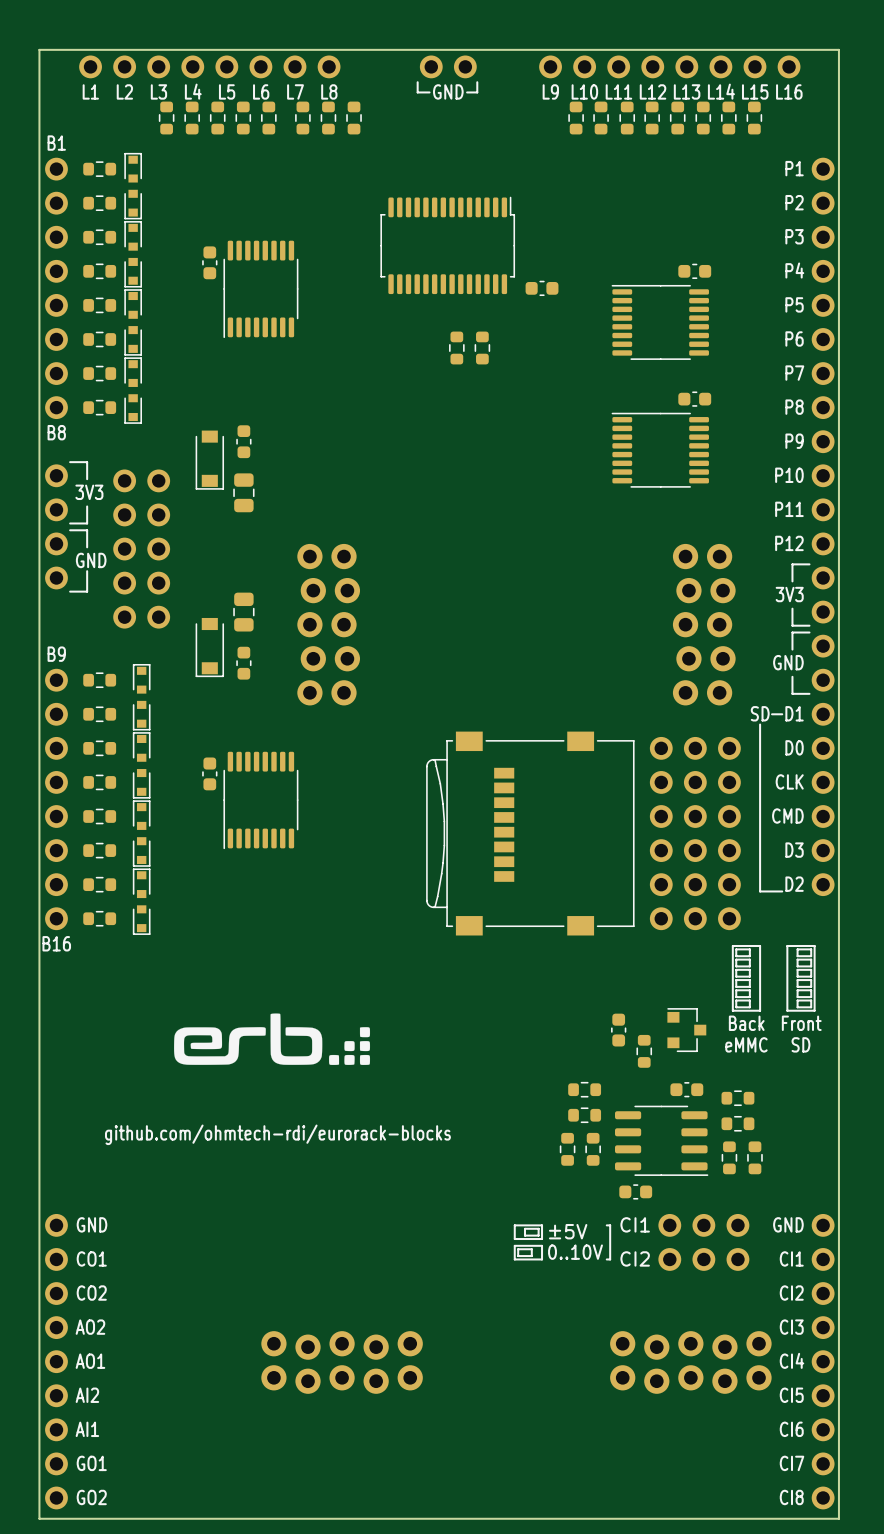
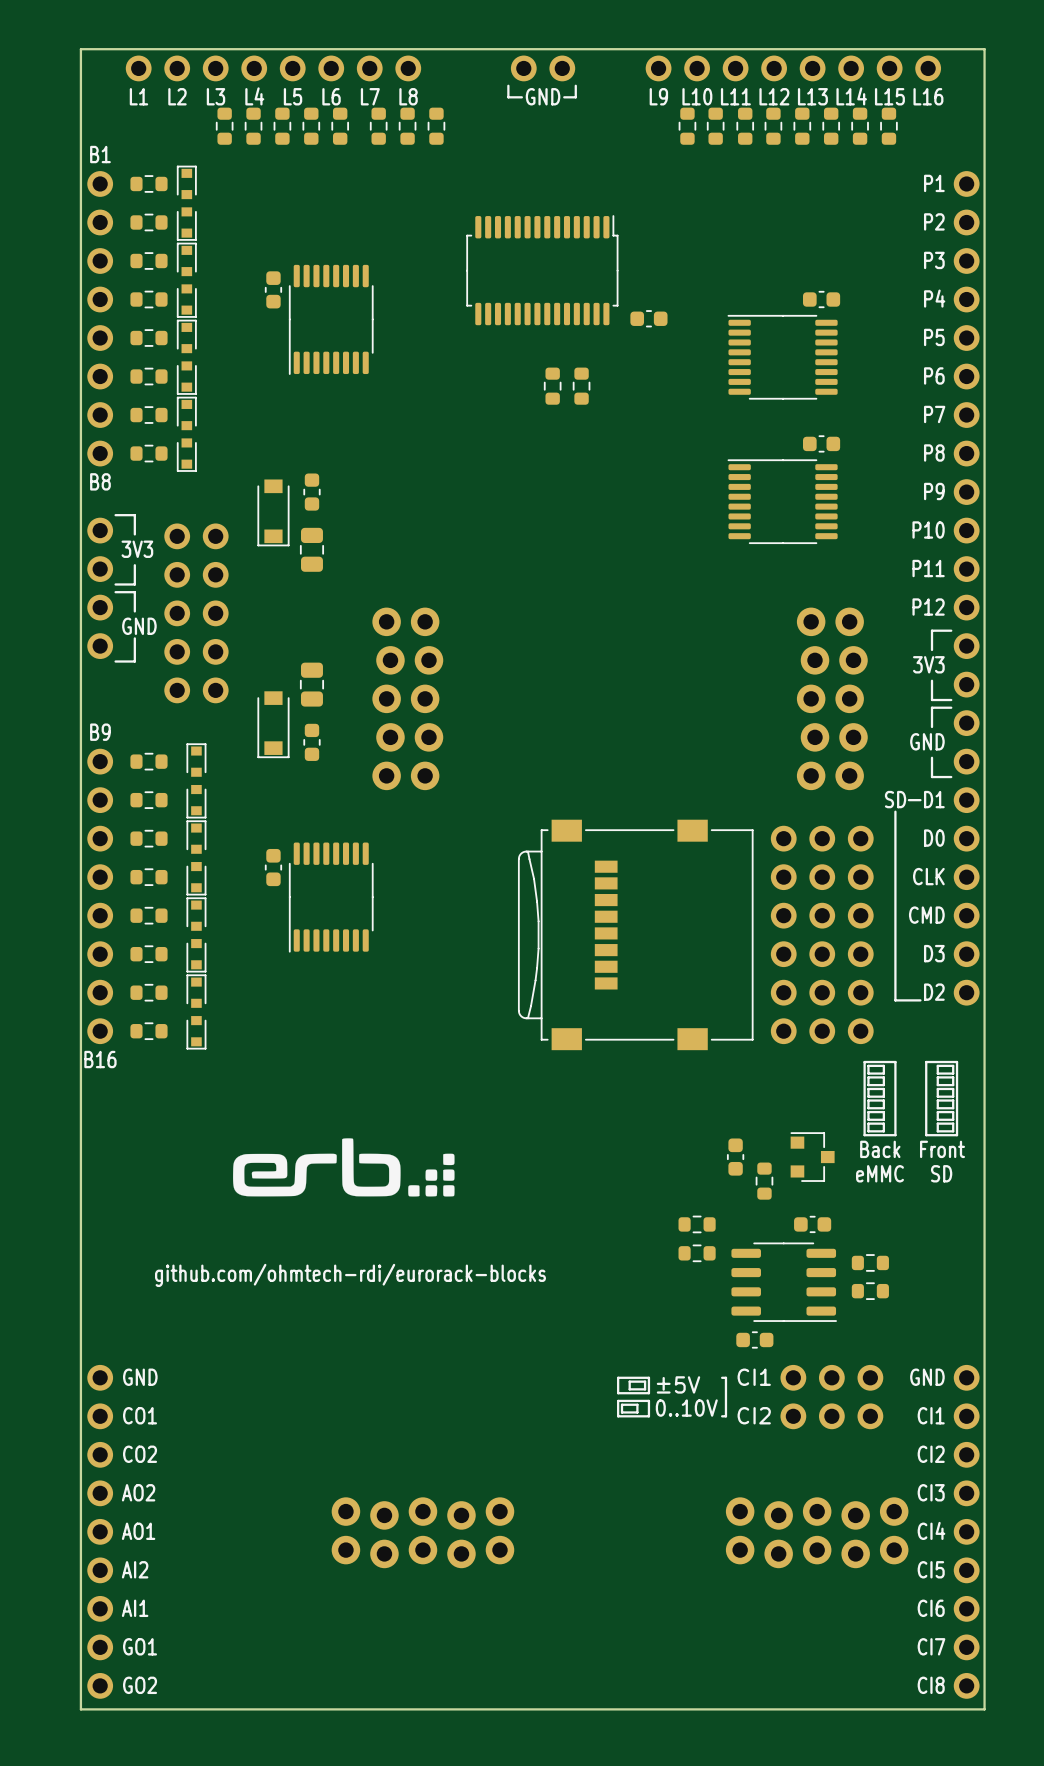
part: (737, 1098) -> none
part: none -> (870, 1291)
part: (567, 1149) -> none
part: (593, 1149) -> none
part: (729, 1157) -> none
part: (754, 1157) -> none

